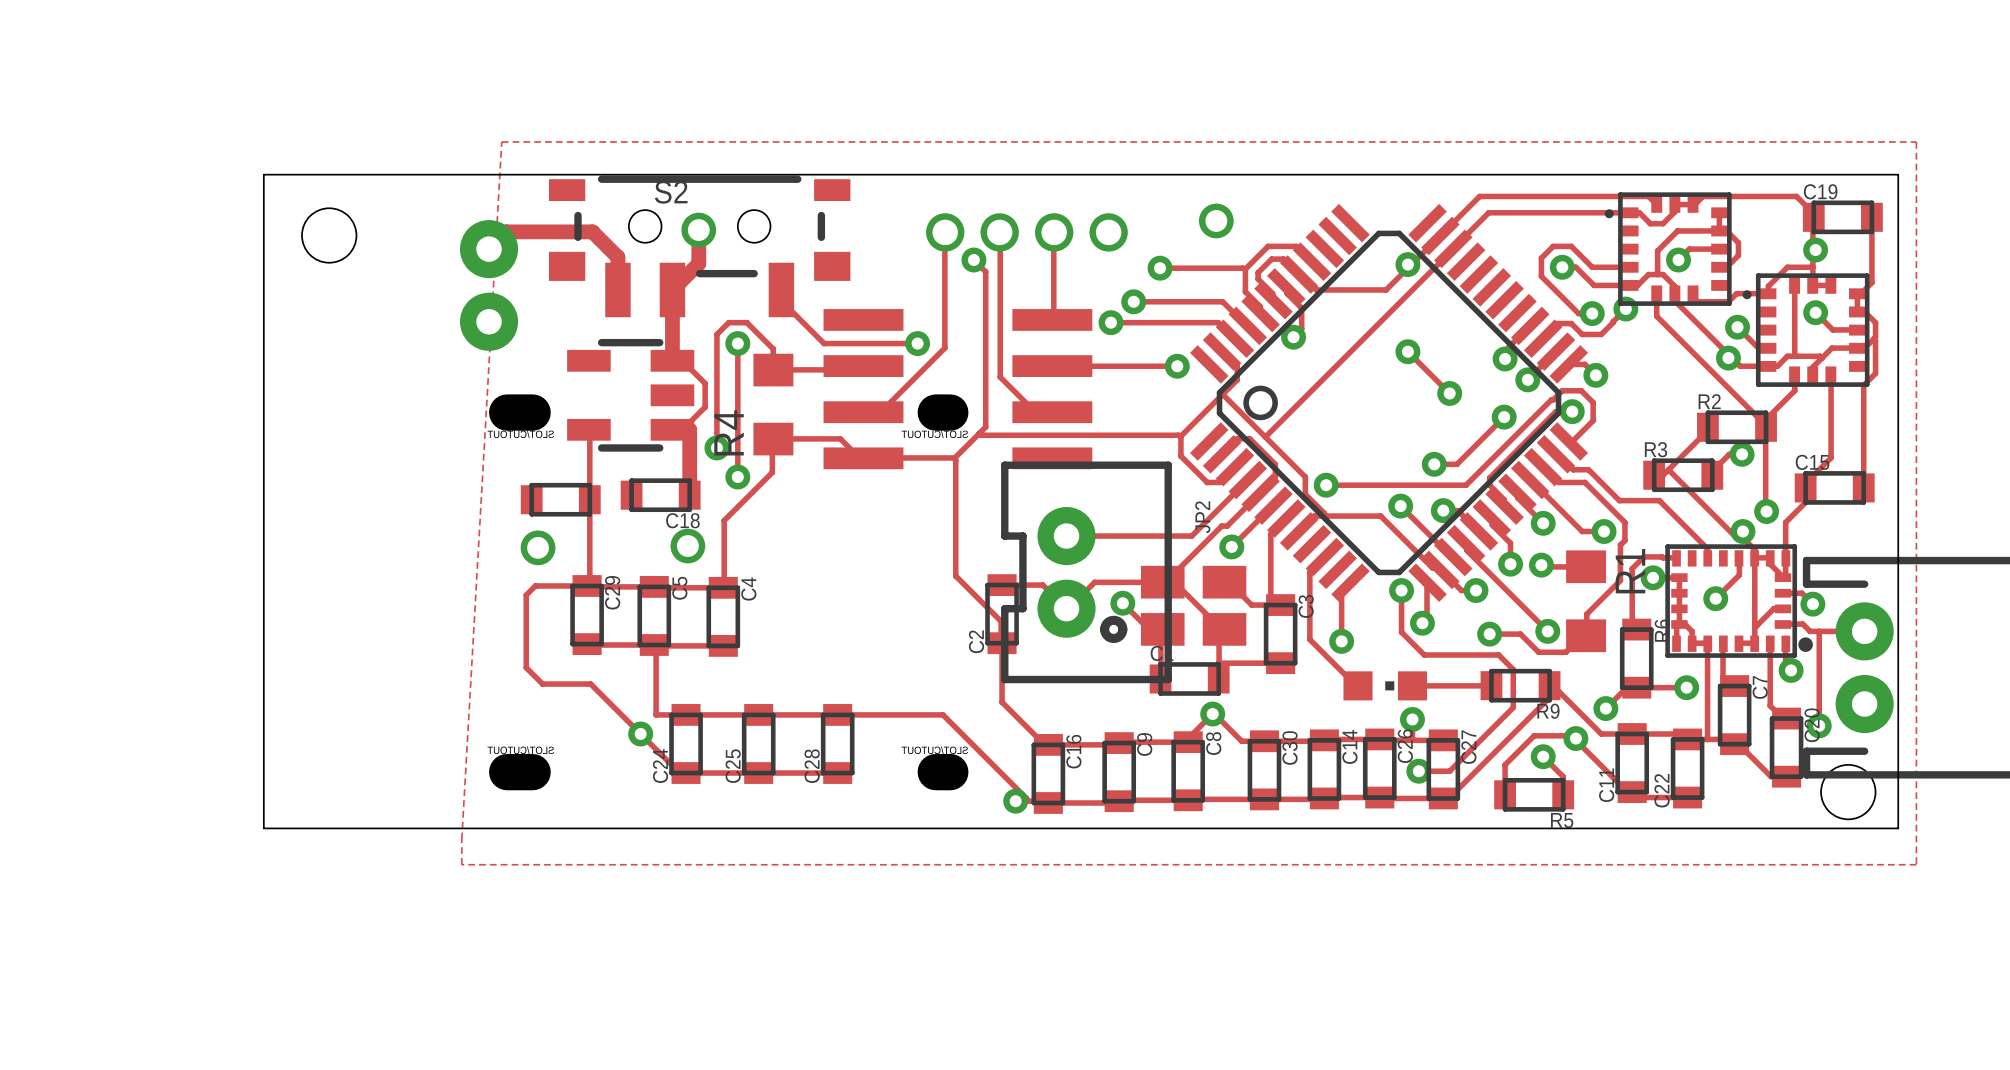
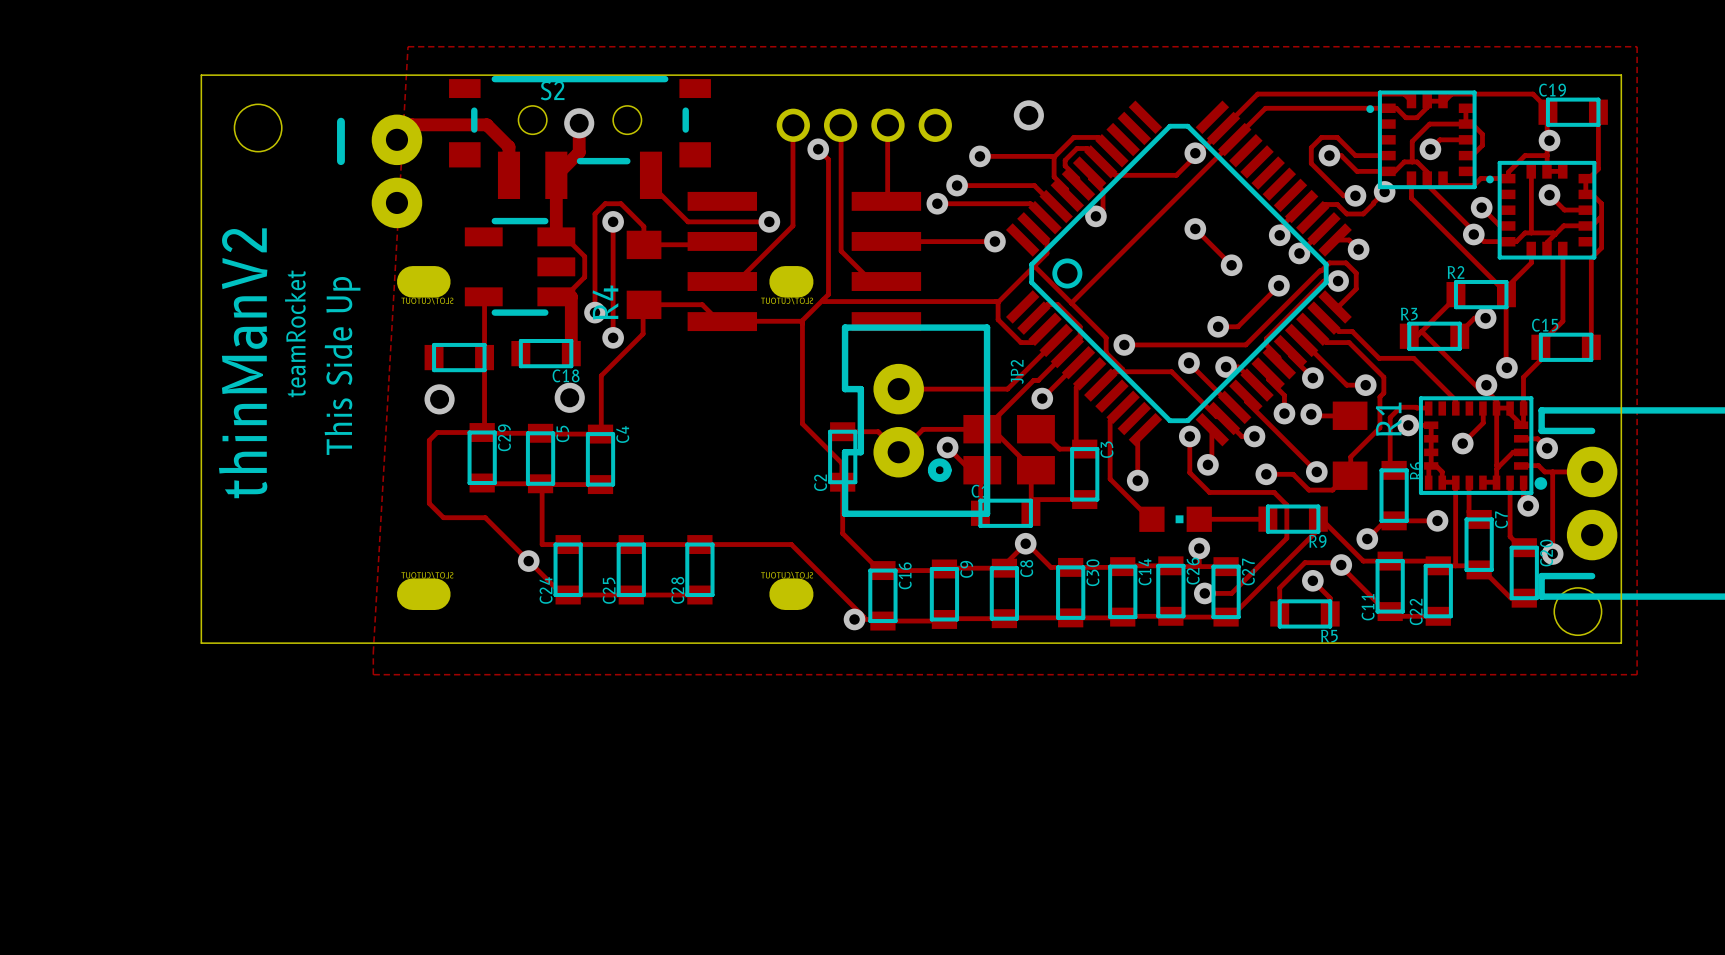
line: none -> (340, 121) (340, 161)
text: none -> teamRocket (295, 333)
text: none -> thinManV2 (243, 363)
text: none -> This Side Up (342, 365)

